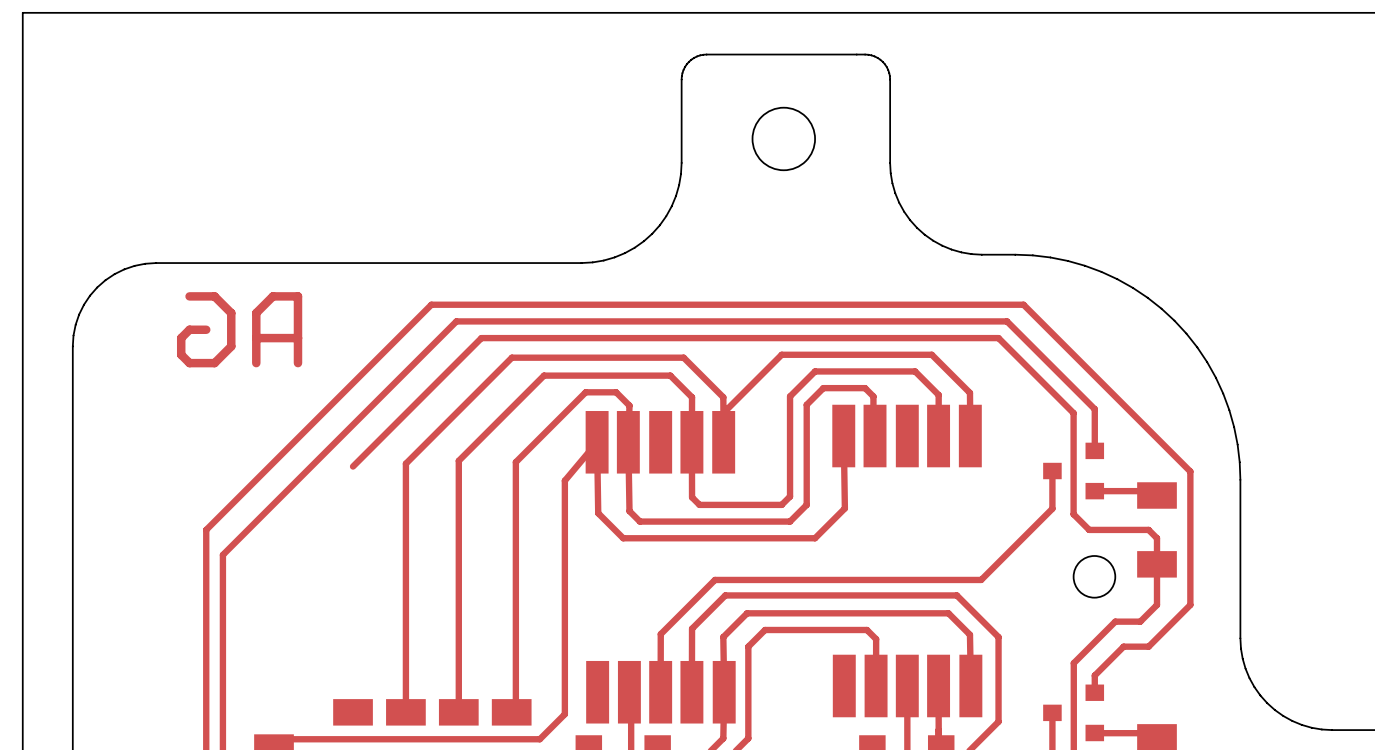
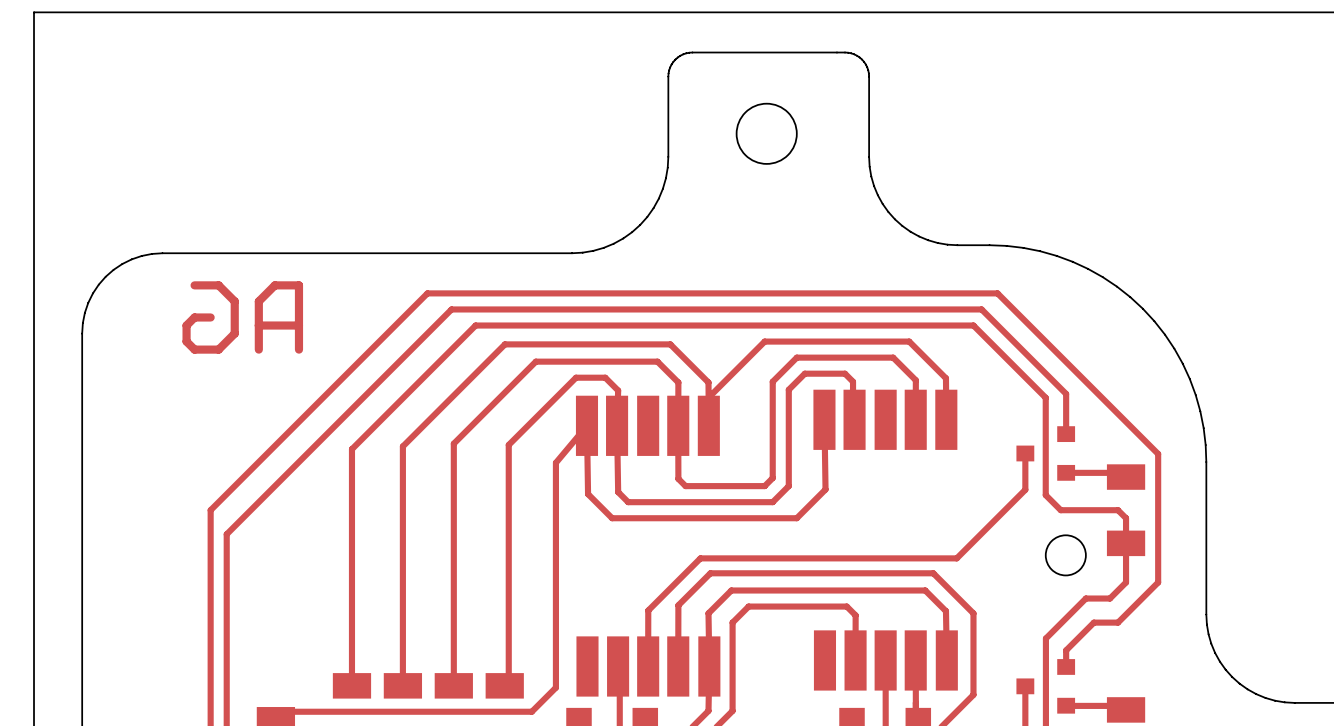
top track: none -> (351, 449) (351, 685)

